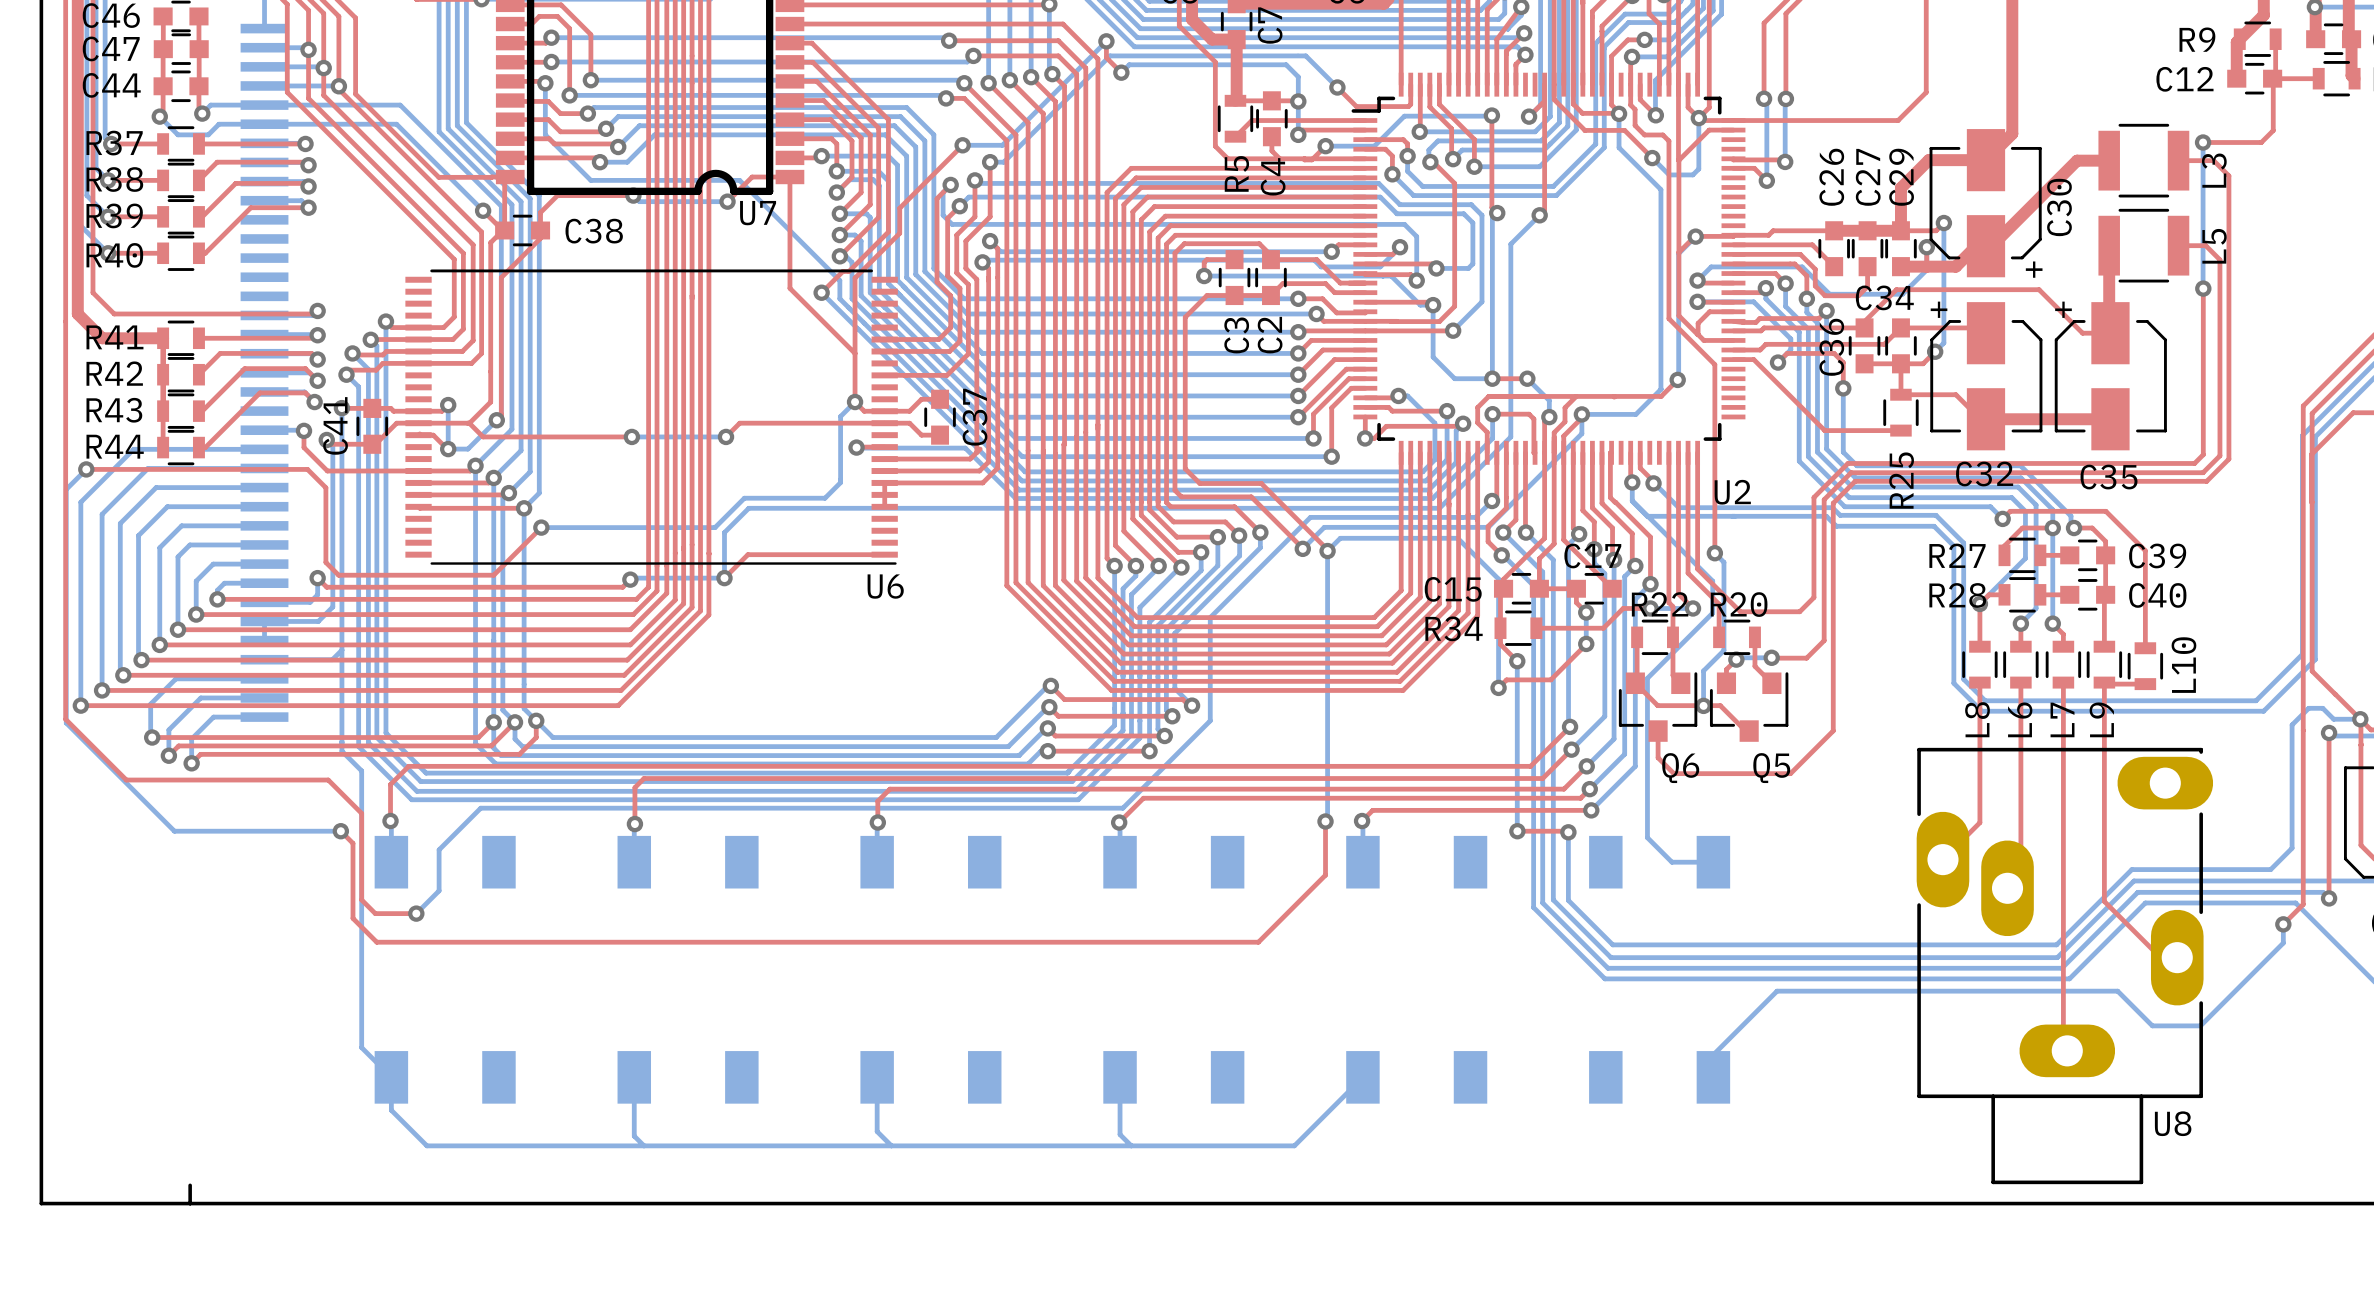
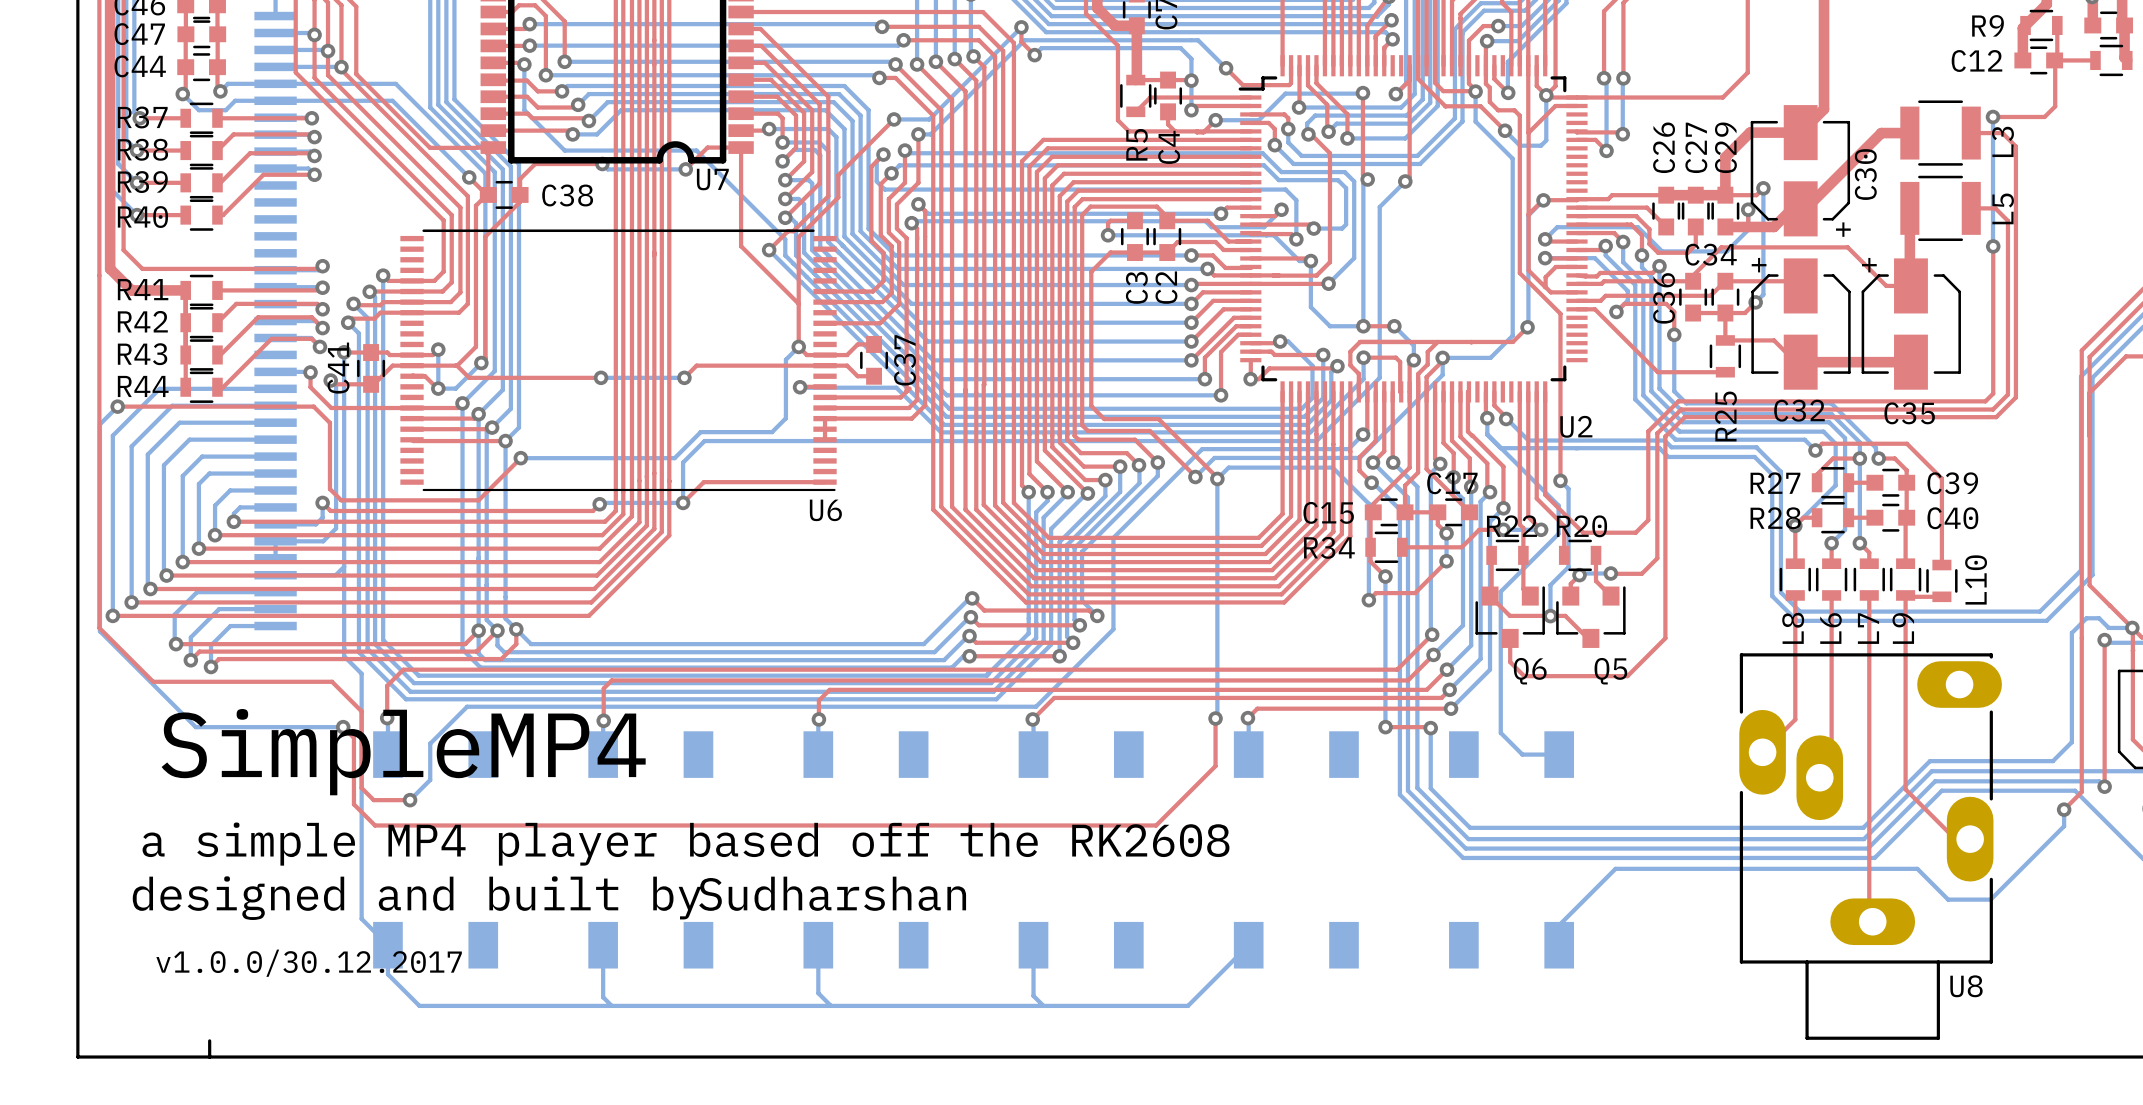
text: none -> SimpleMP4 (403, 752)
text: none -> a simple MP4 player based off the RK2608 (686, 844)
text: none -> Sudharshan (832, 893)
text: none -> designed and built by (416, 898)
text: none -> v1.0.0/30.12.2017 (309, 963)

